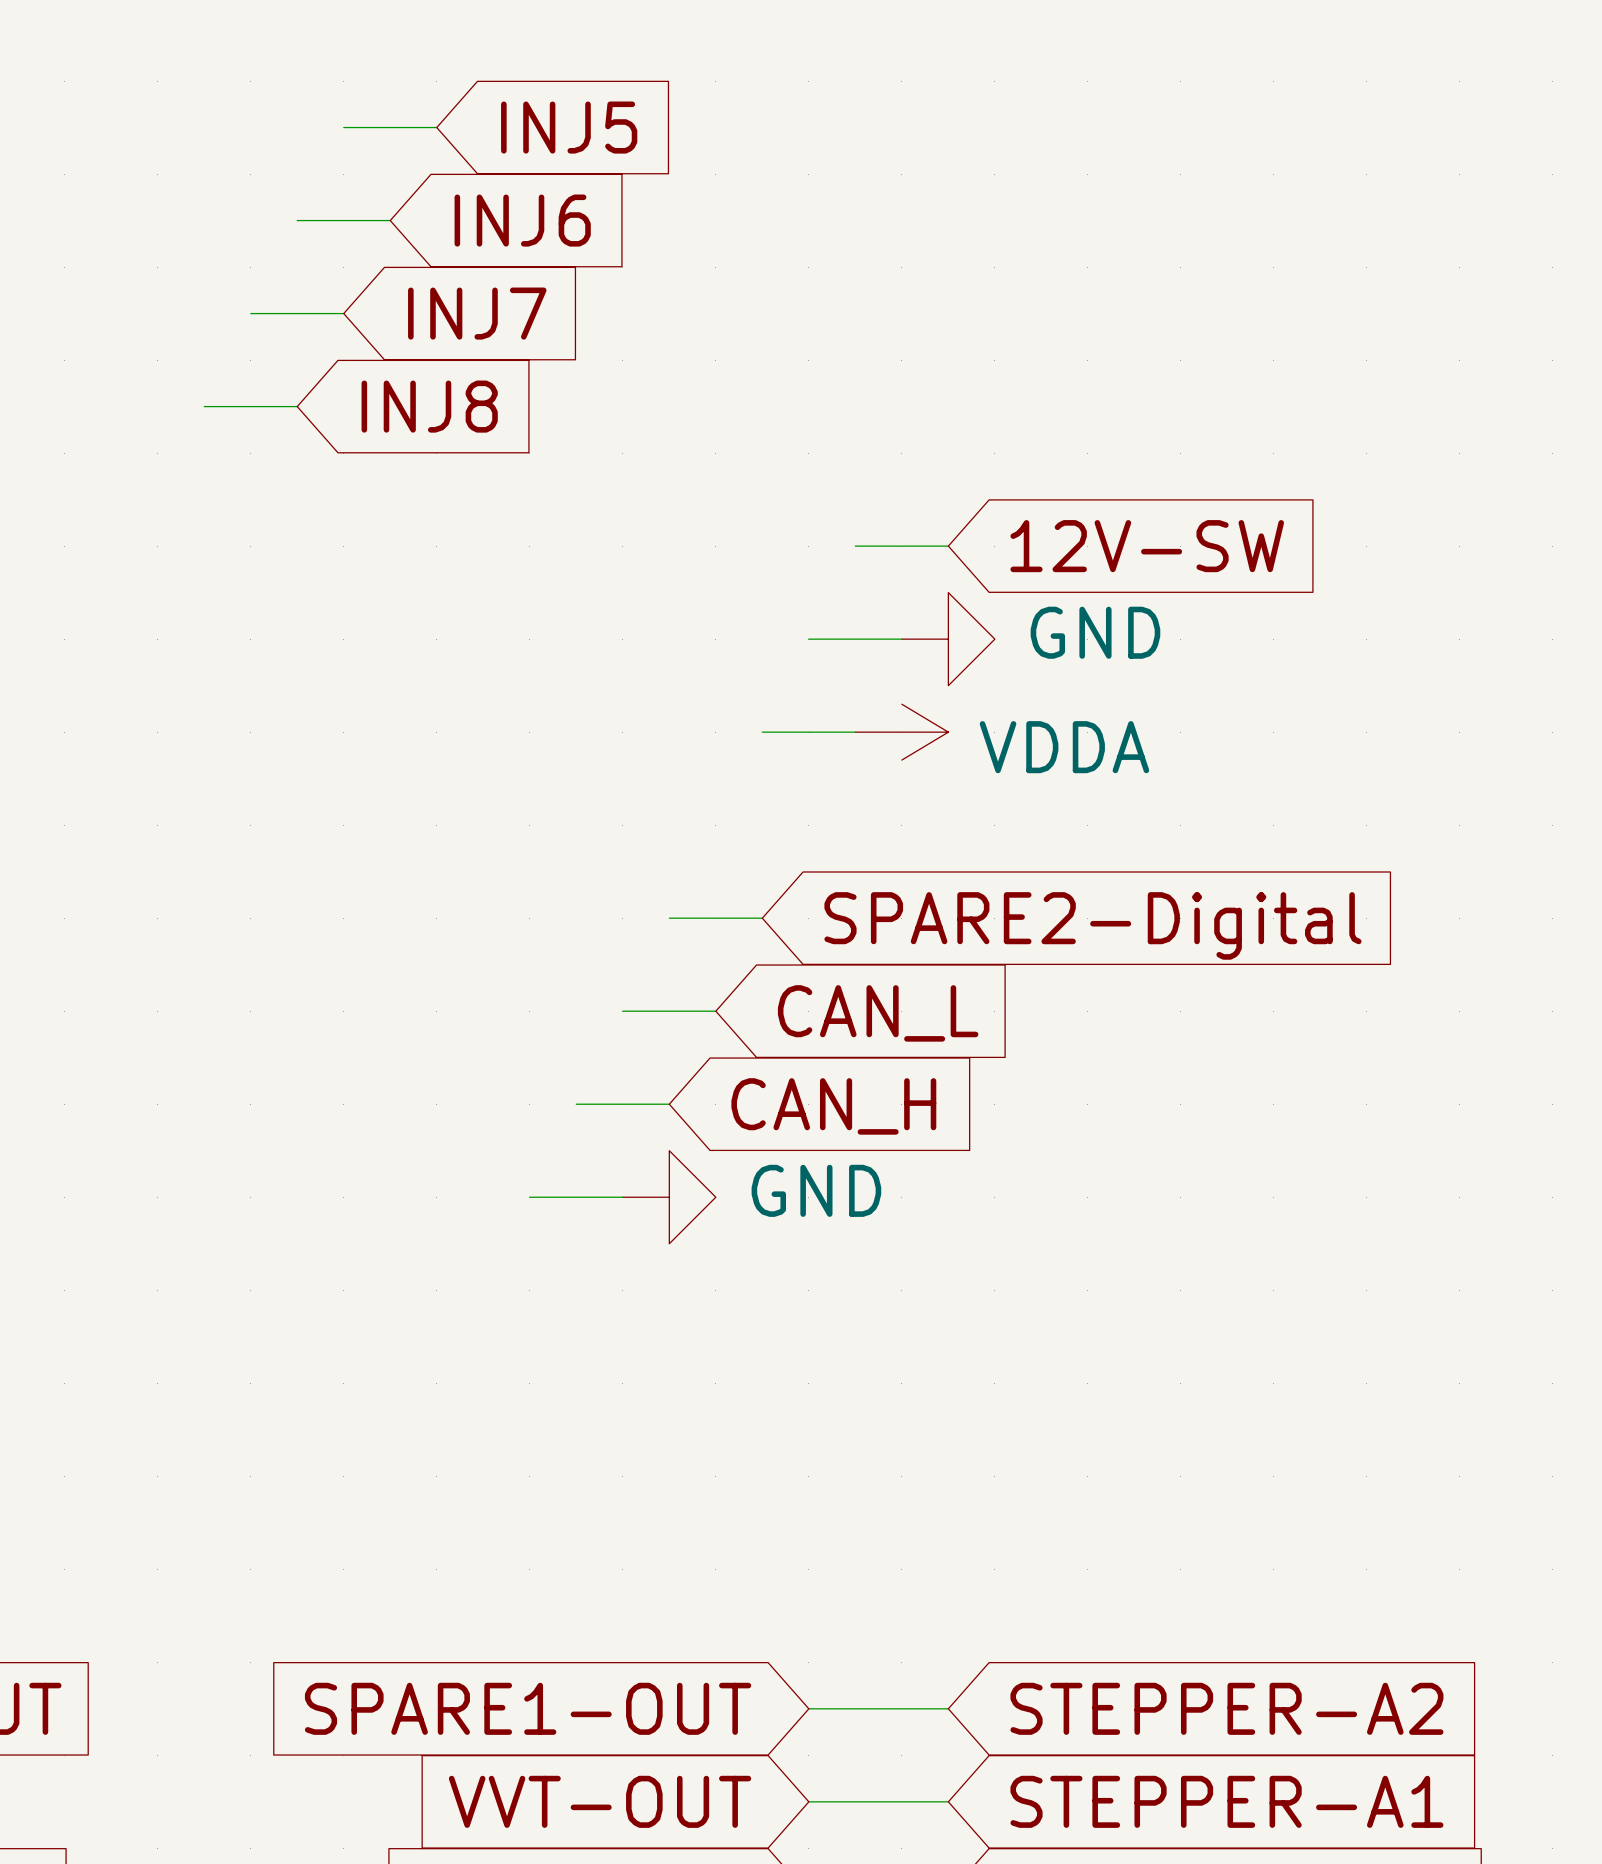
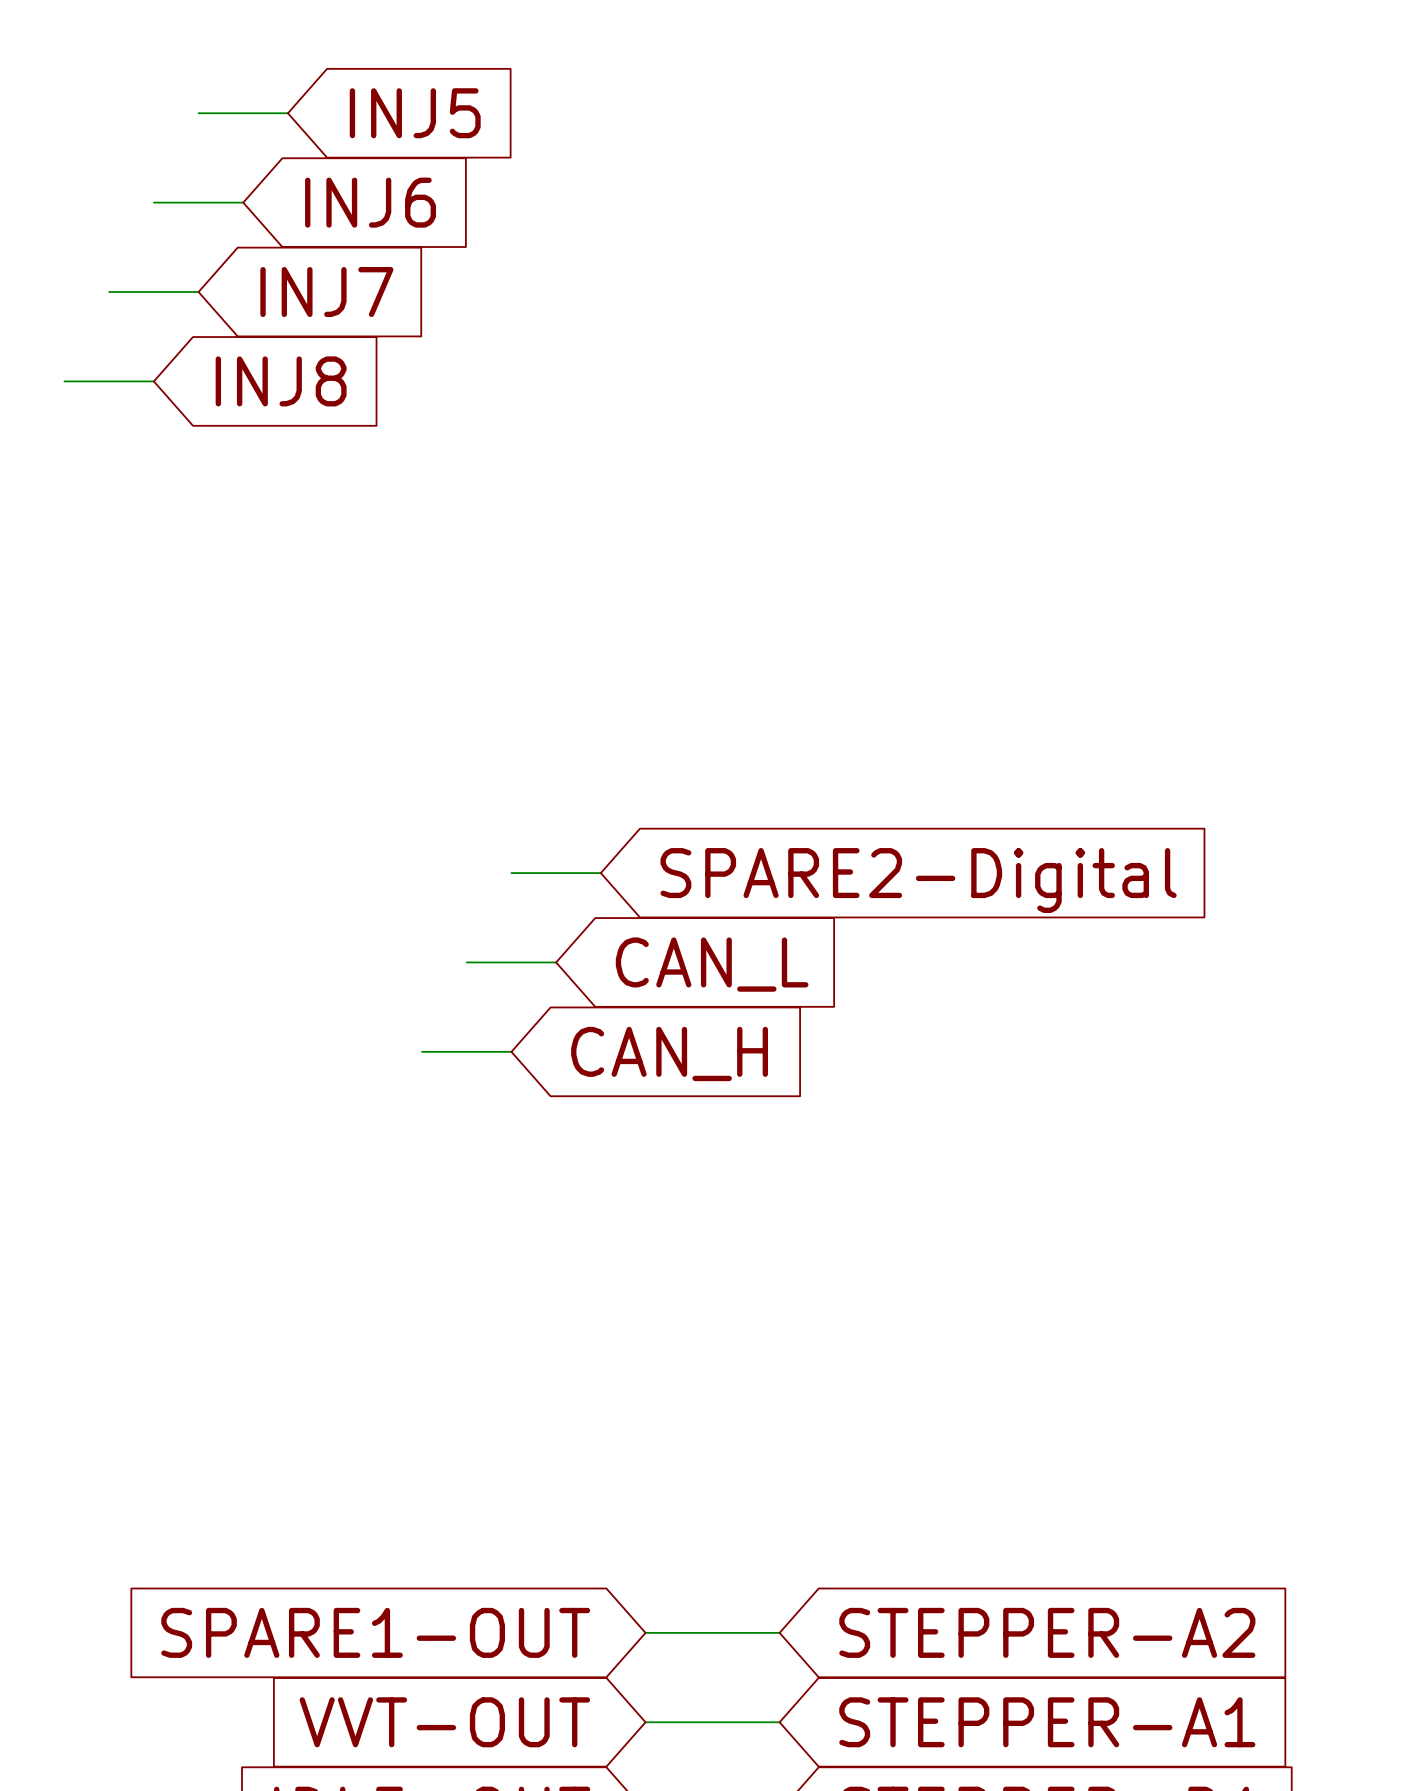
wire: (855, 546) (948, 546) -> none
global label: 12V-SW (1147, 546) -> none
wire: (808, 639) (901, 639) -> none
power symbol: GND (948, 639) -> none
wire: (762, 732) (855, 732) -> none
power symbol: VDDA (901, 732) -> none
wire: (529, 1197) (622, 1197) -> none
power symbol: GND (669, 1197) -> none

